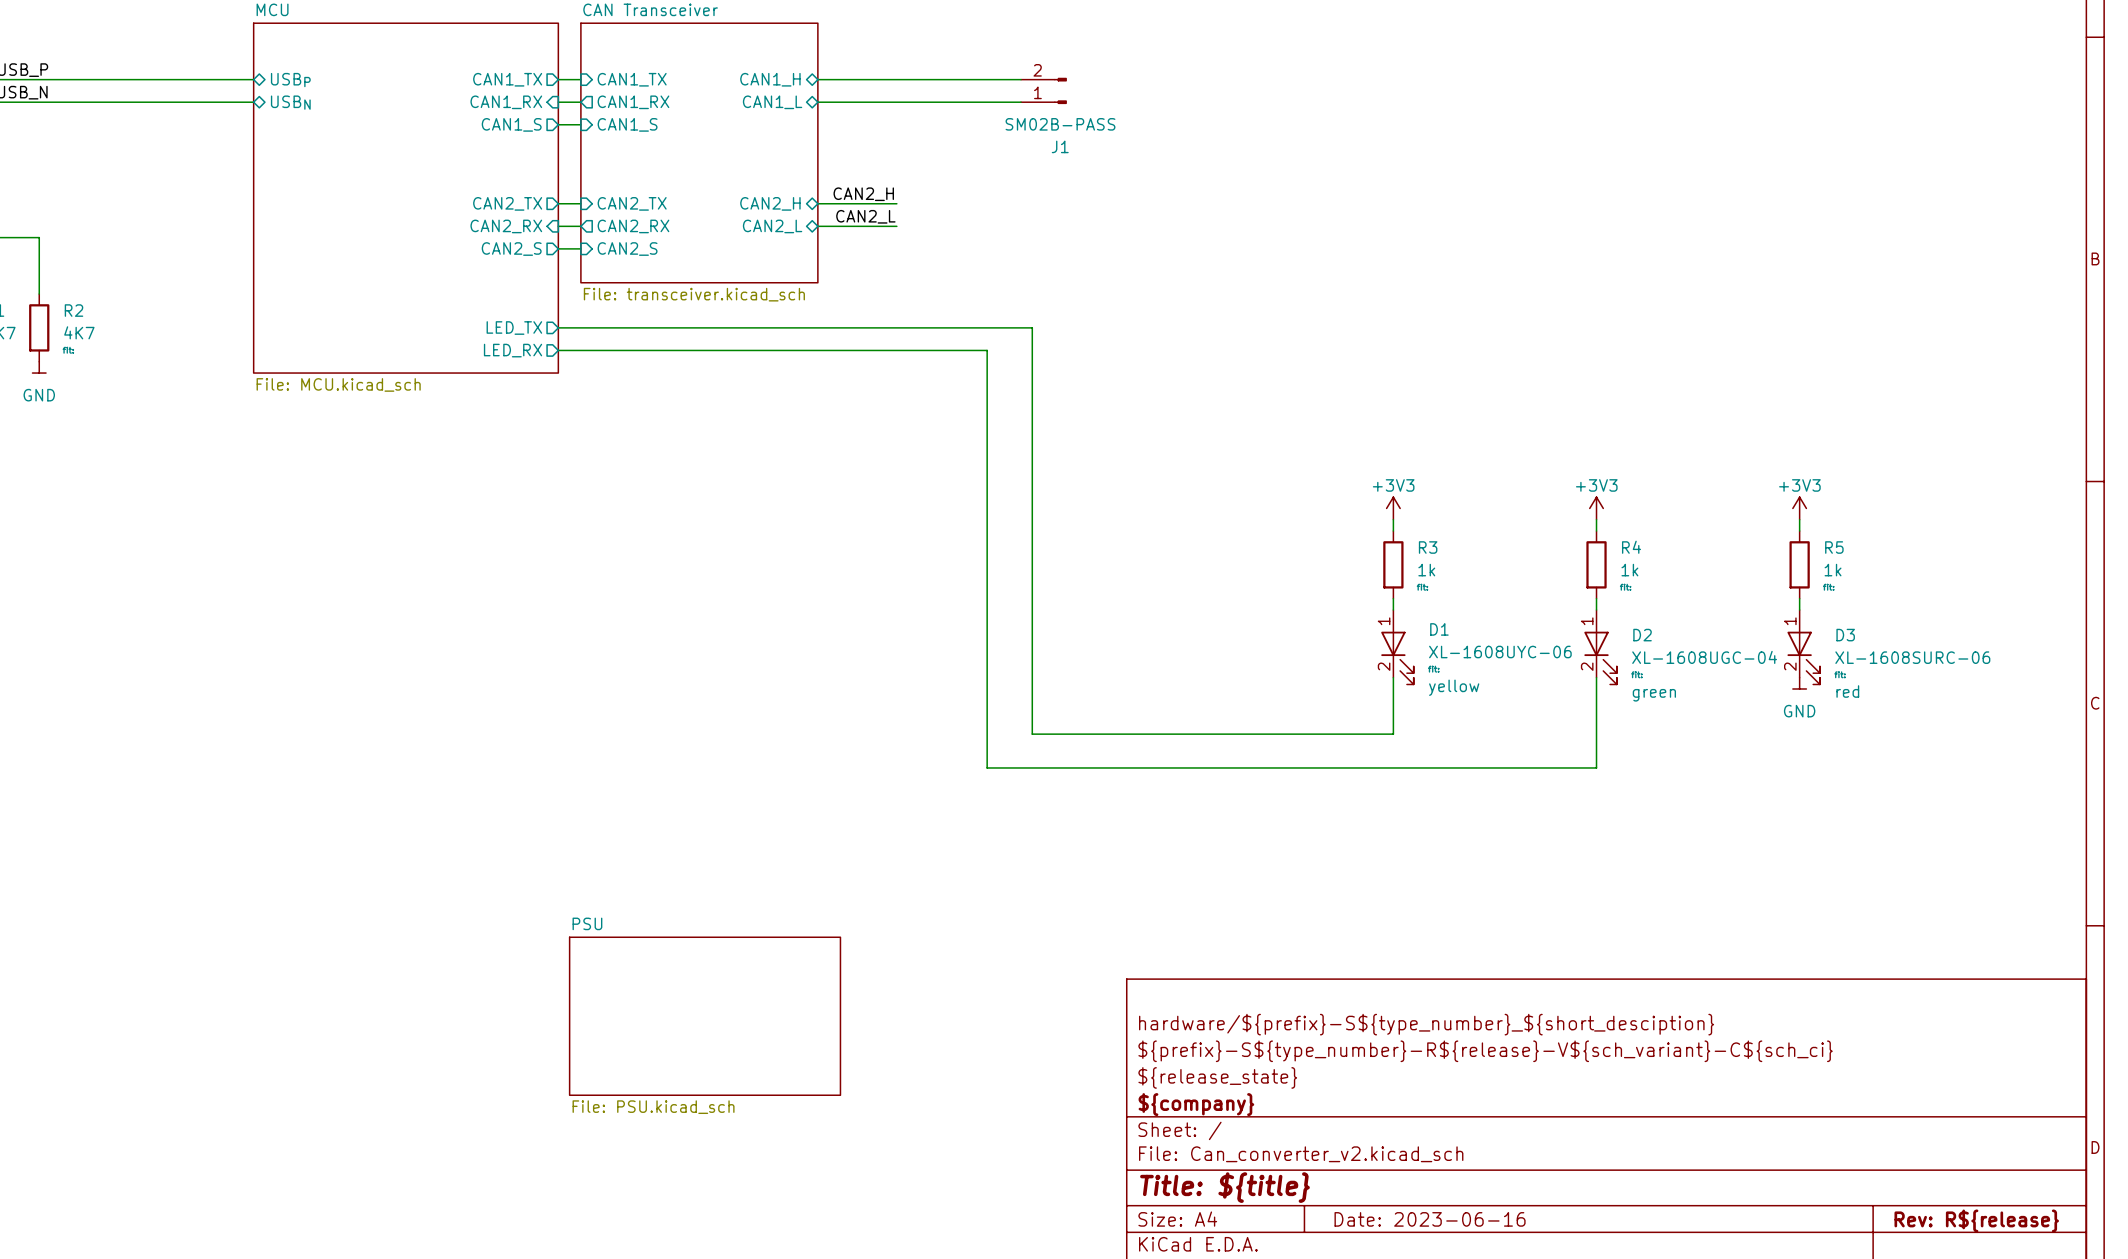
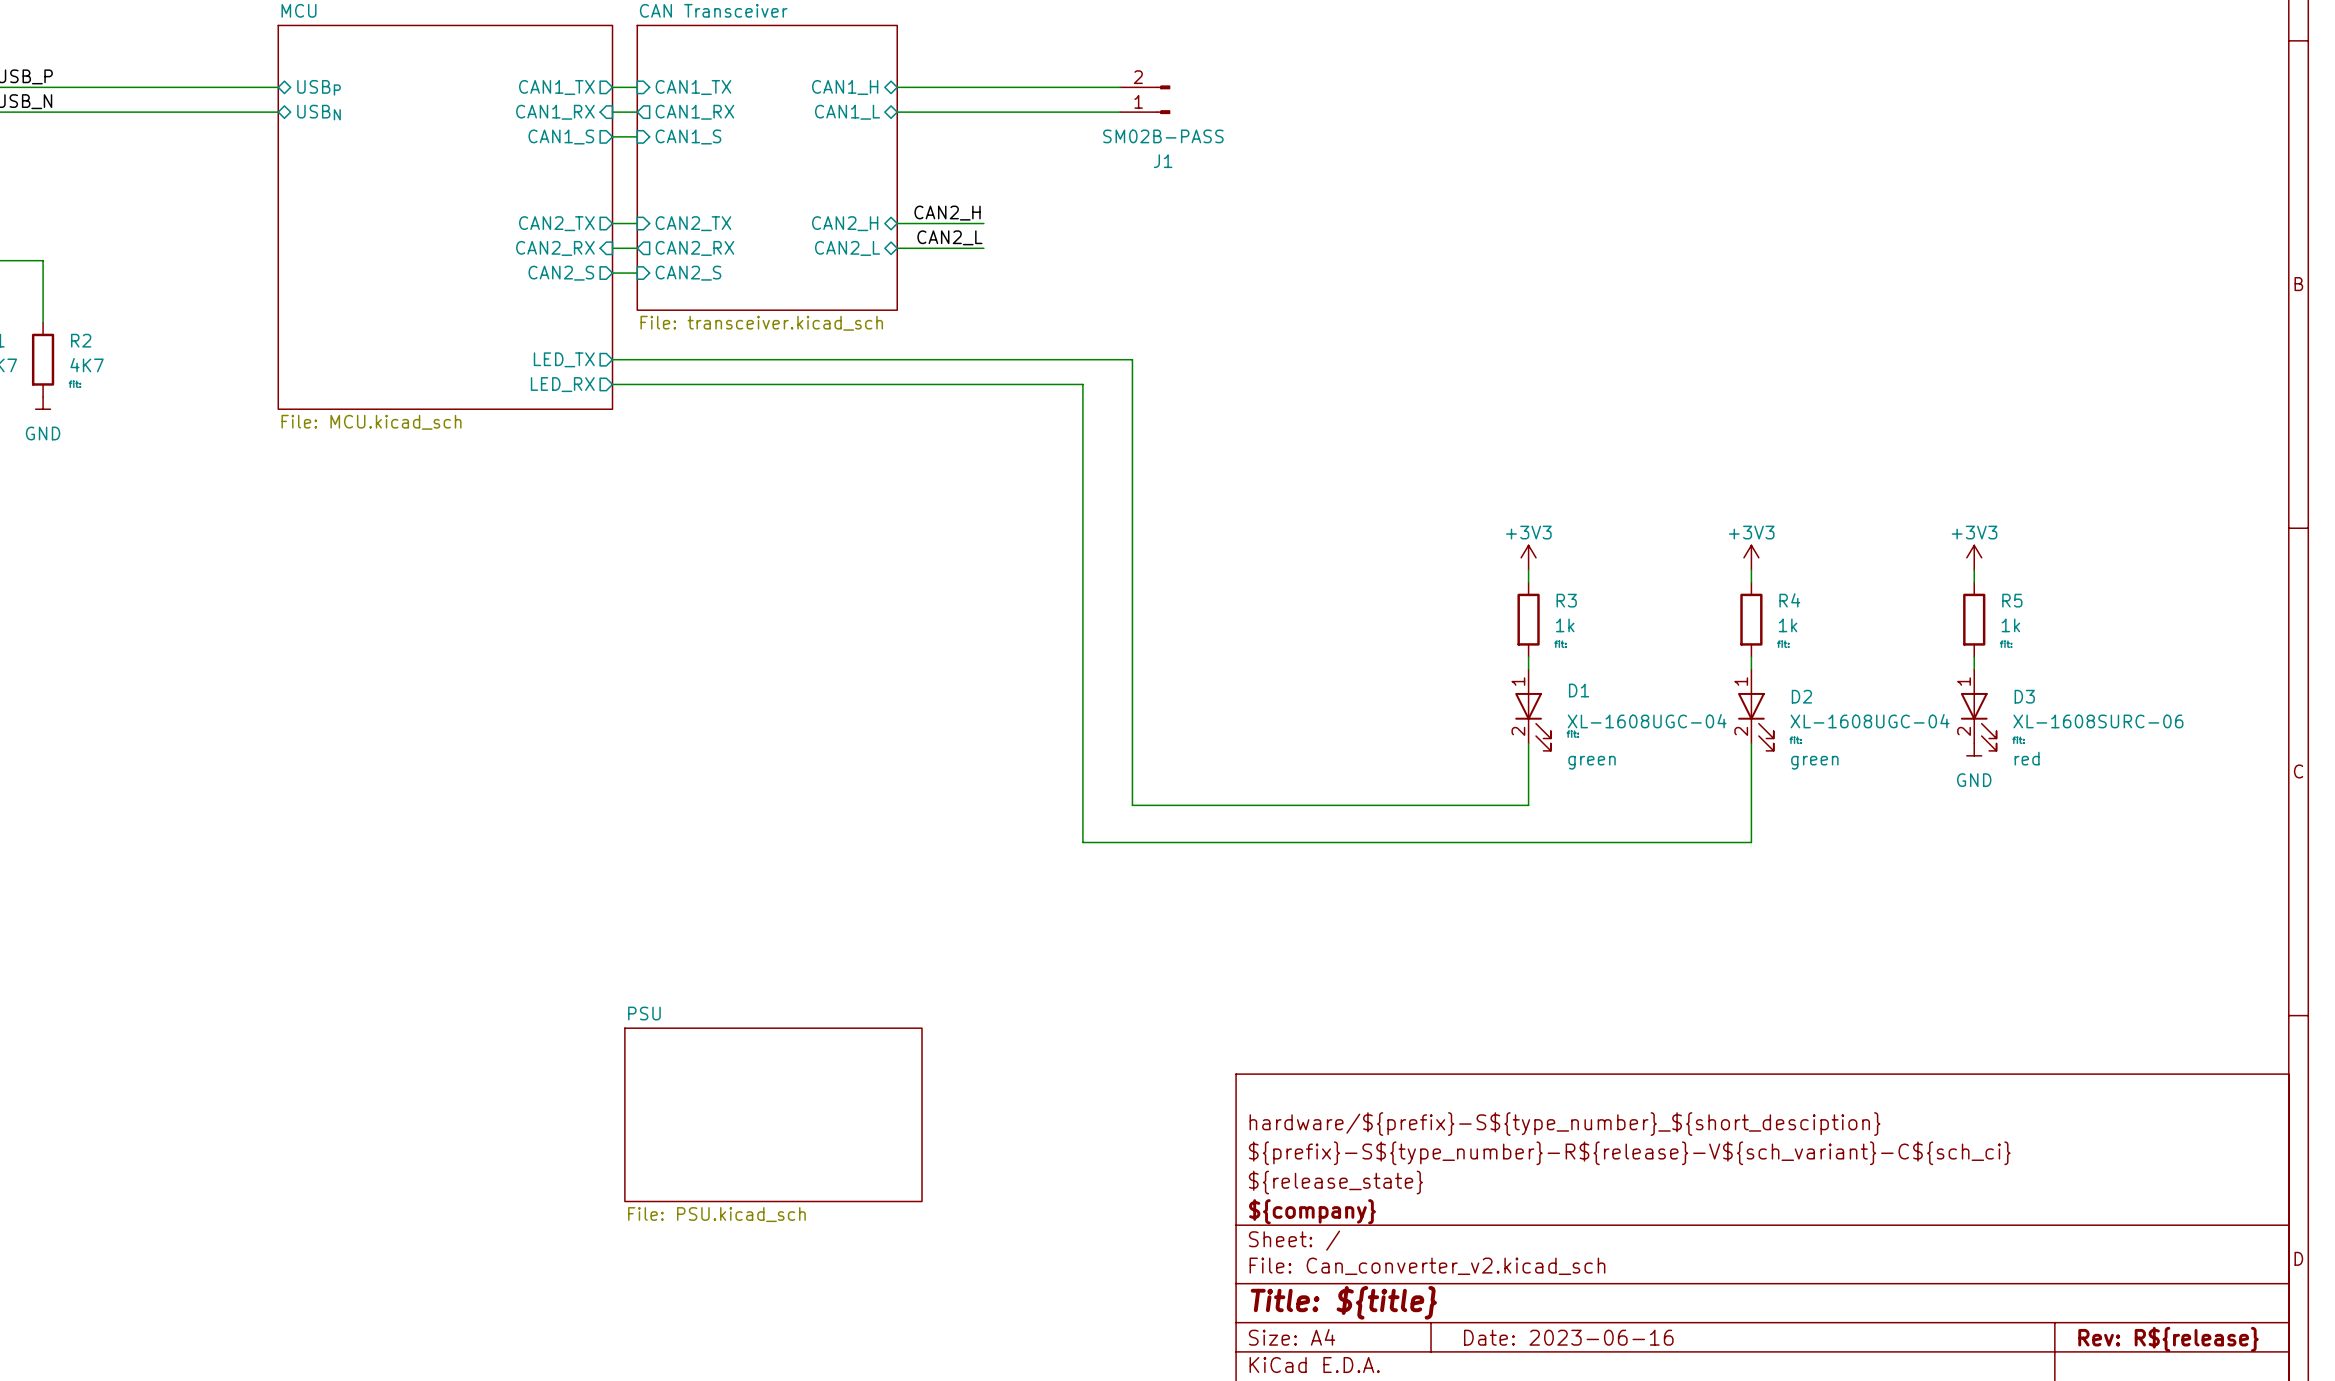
D1 value: XL-1608UYC-06 (1500, 652) -> XL-1608UGC-04 (1647, 721)
D1 text: yellow (1454, 687) -> green (1592, 762)

